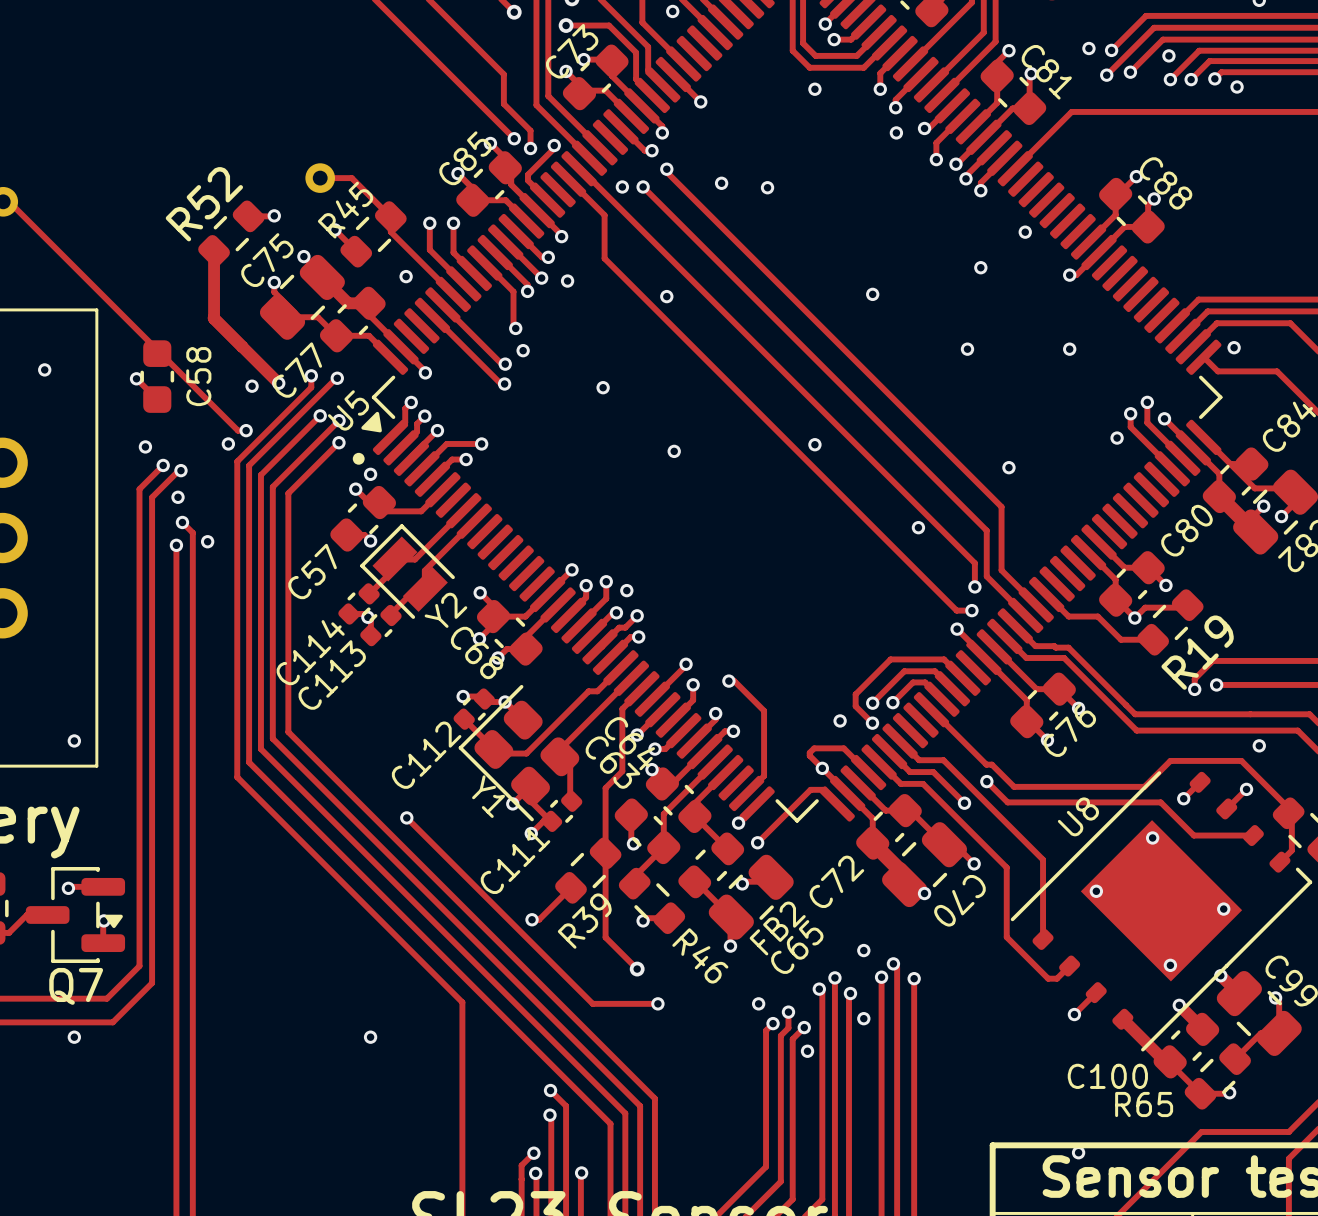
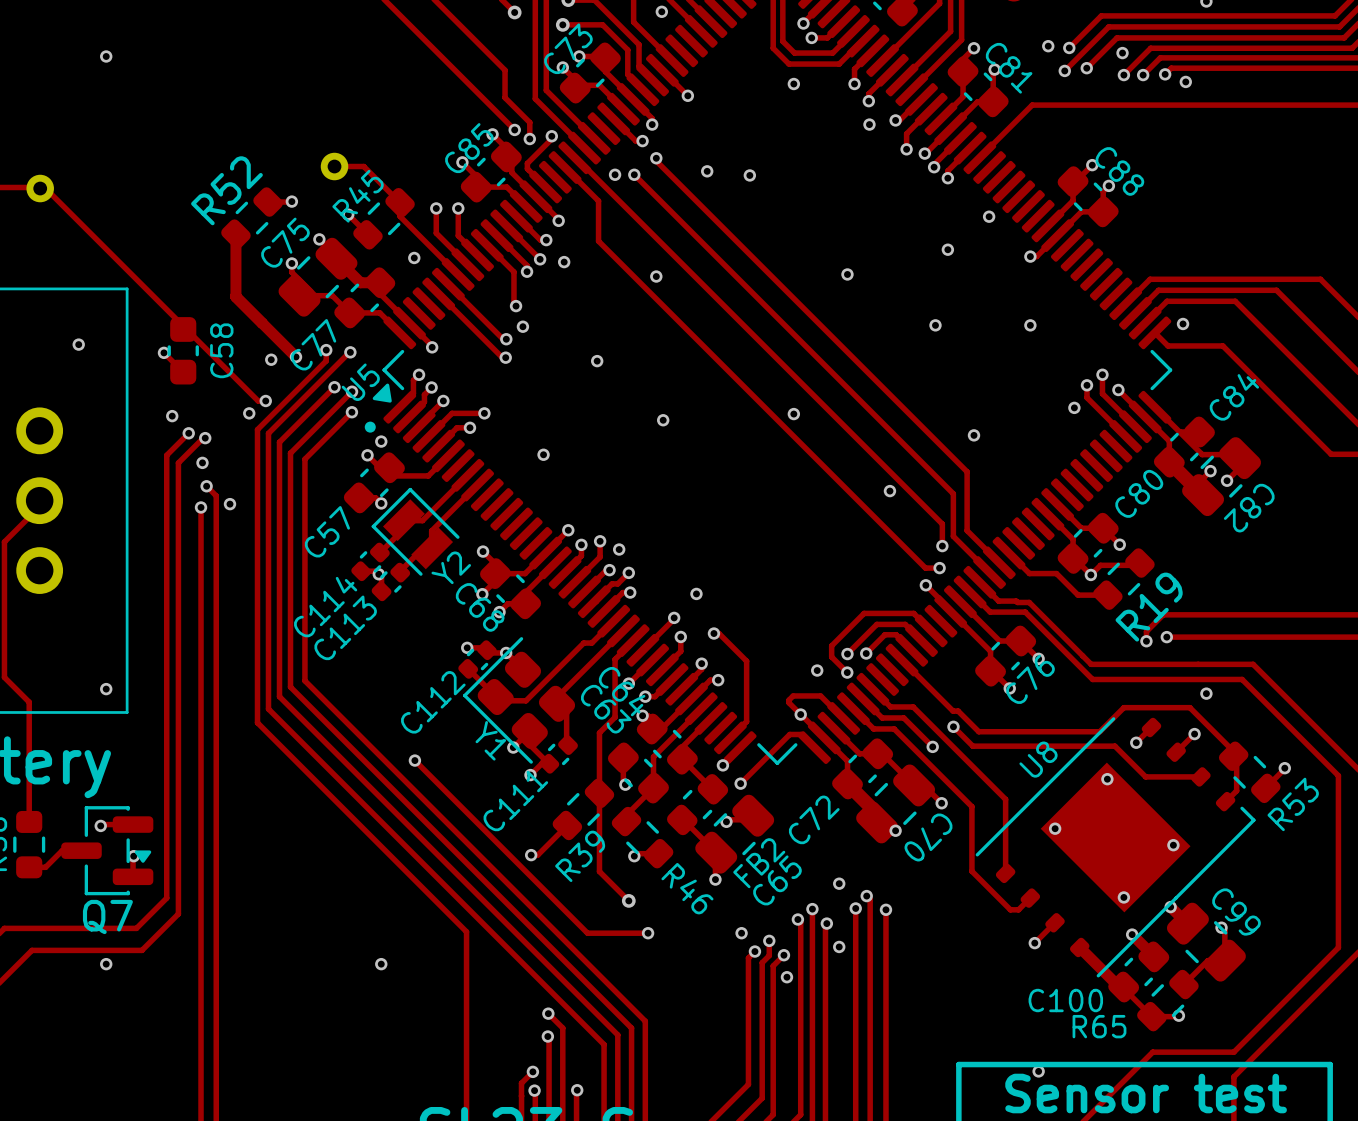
via: none -> (106, 56)
via: none -> (543, 454)
via: none -> (696, 593)

